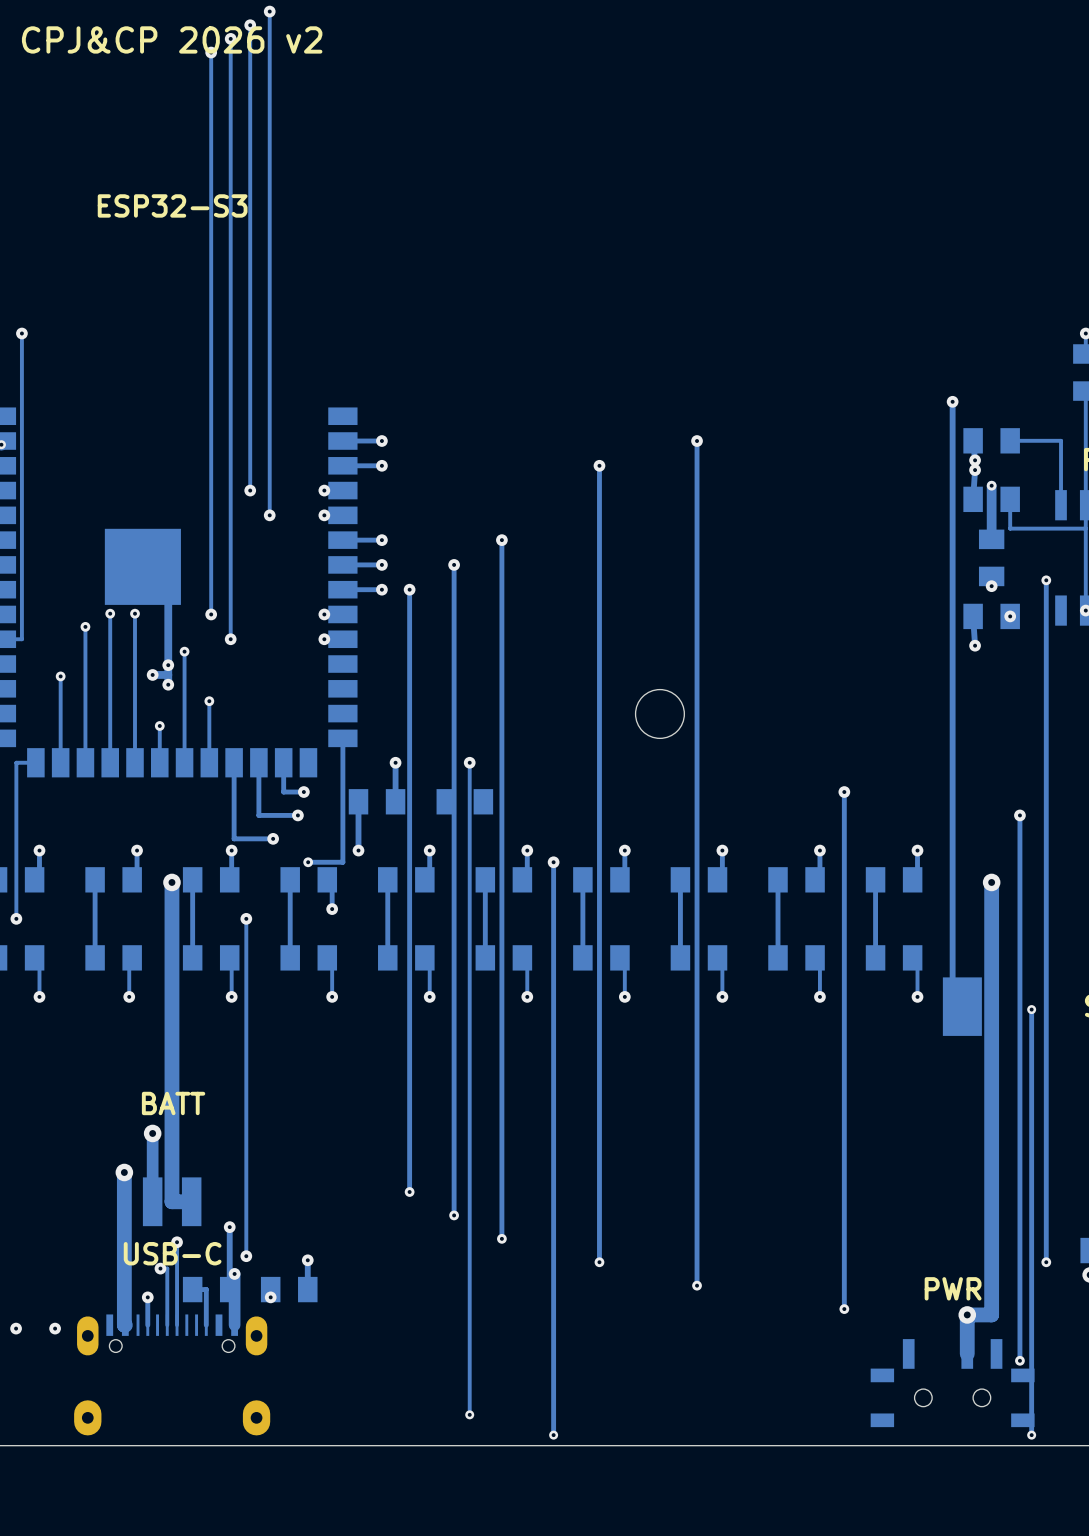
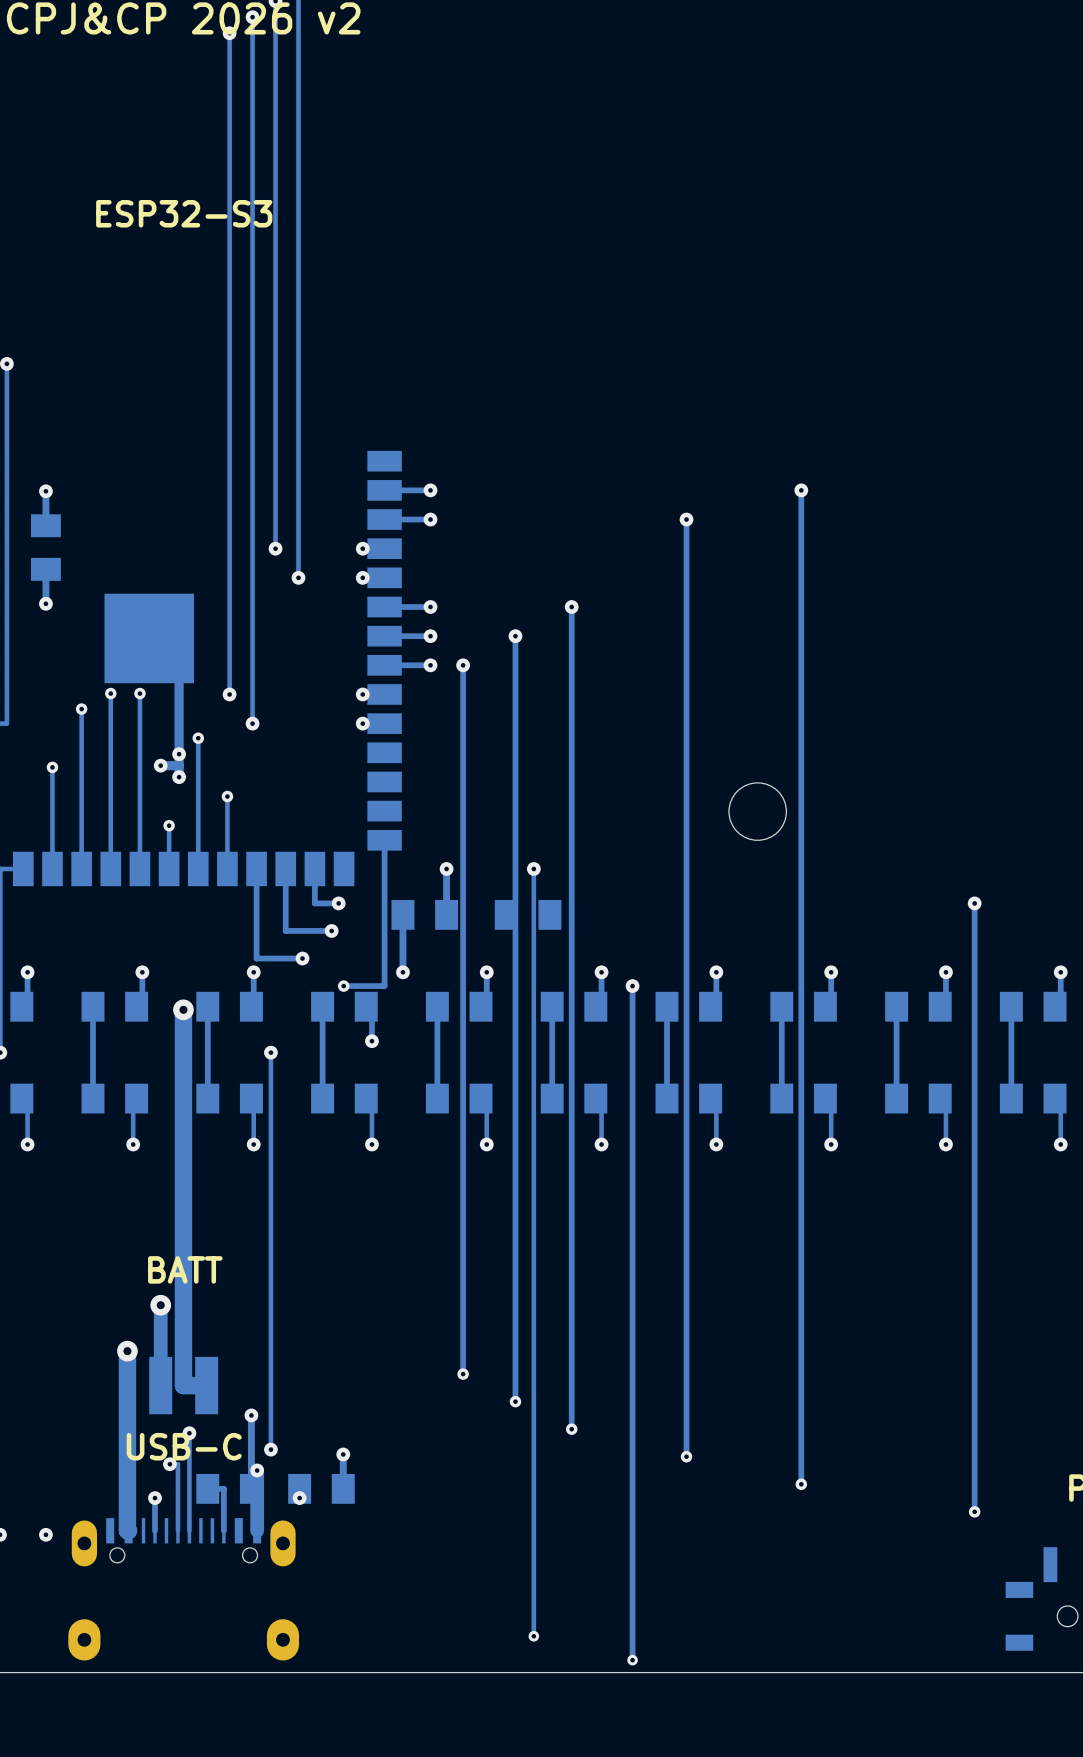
track: none -> (45, 491) (45, 525)
via: none -> (45, 491)
part: none -> (45, 547)
track: none -> (45, 569) (45, 603)
via: none -> (45, 603)

